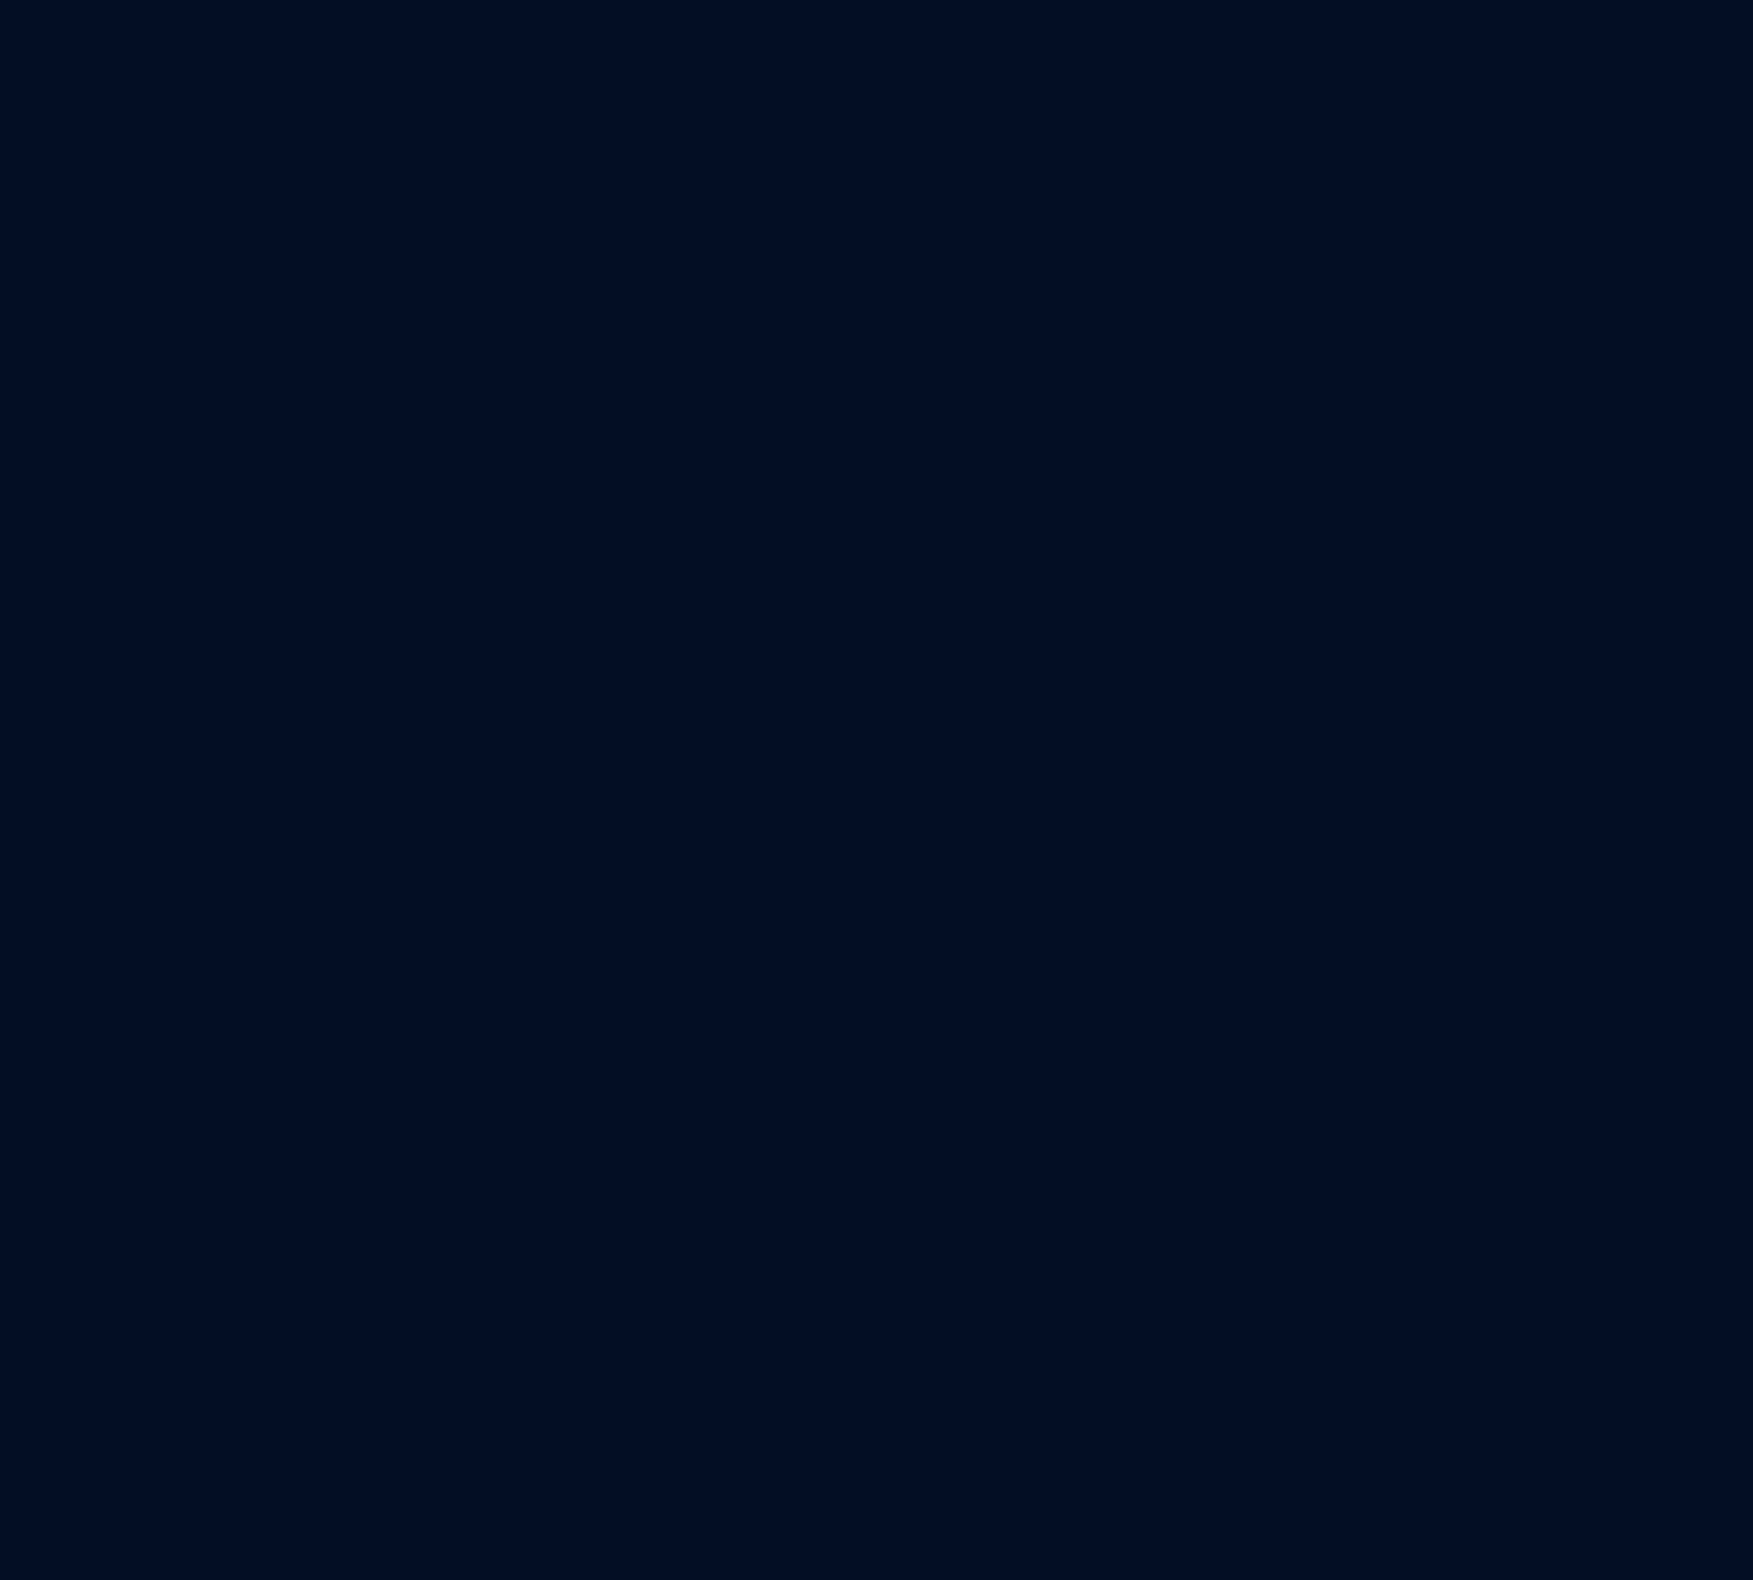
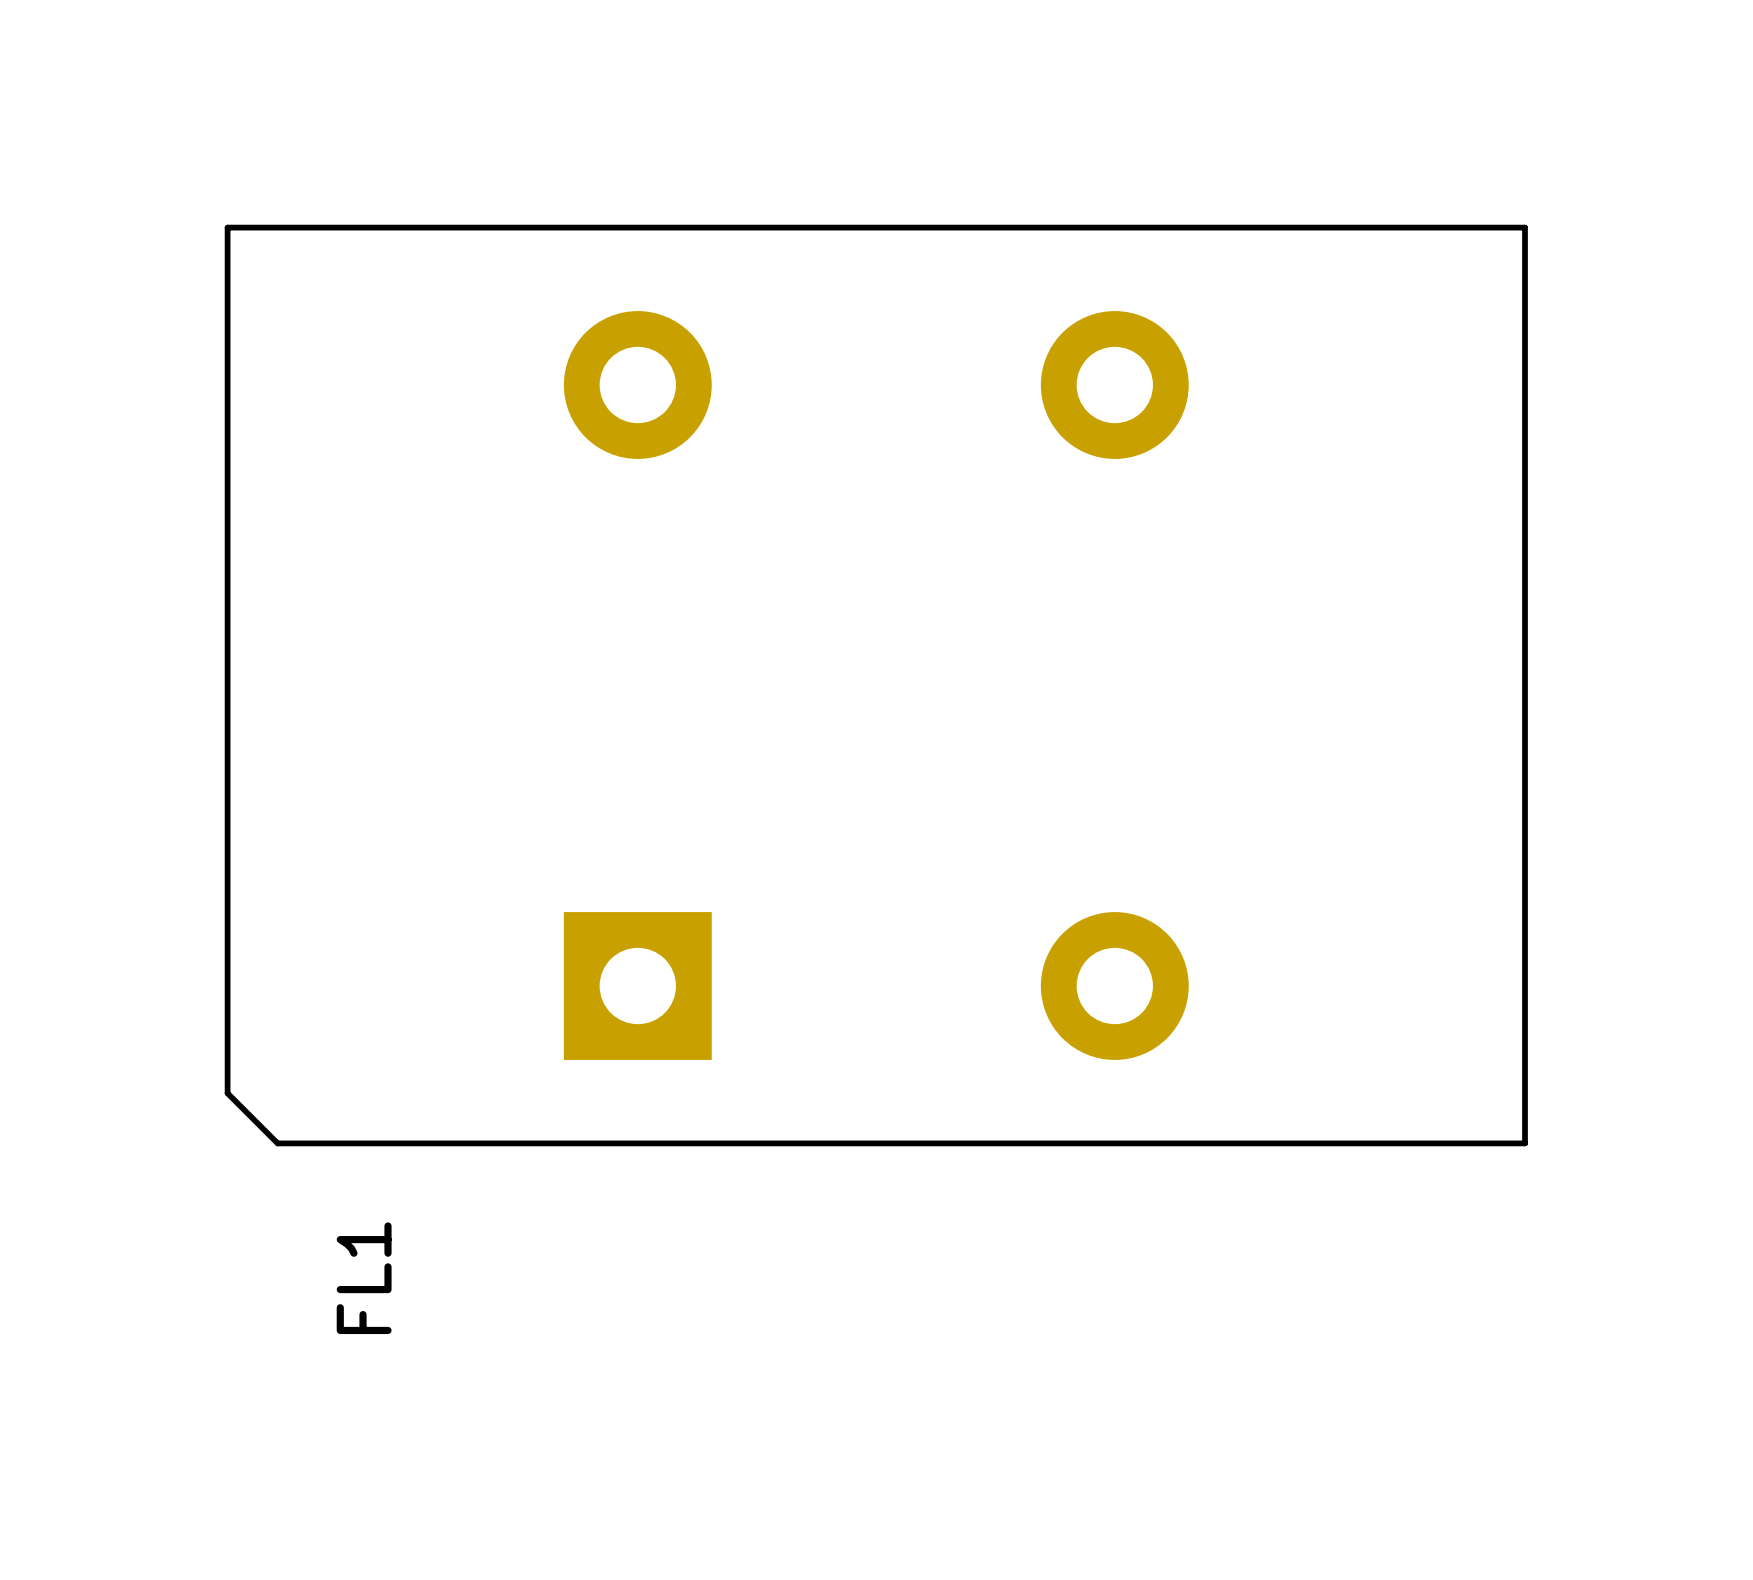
FL1: none -> (876, 685)

